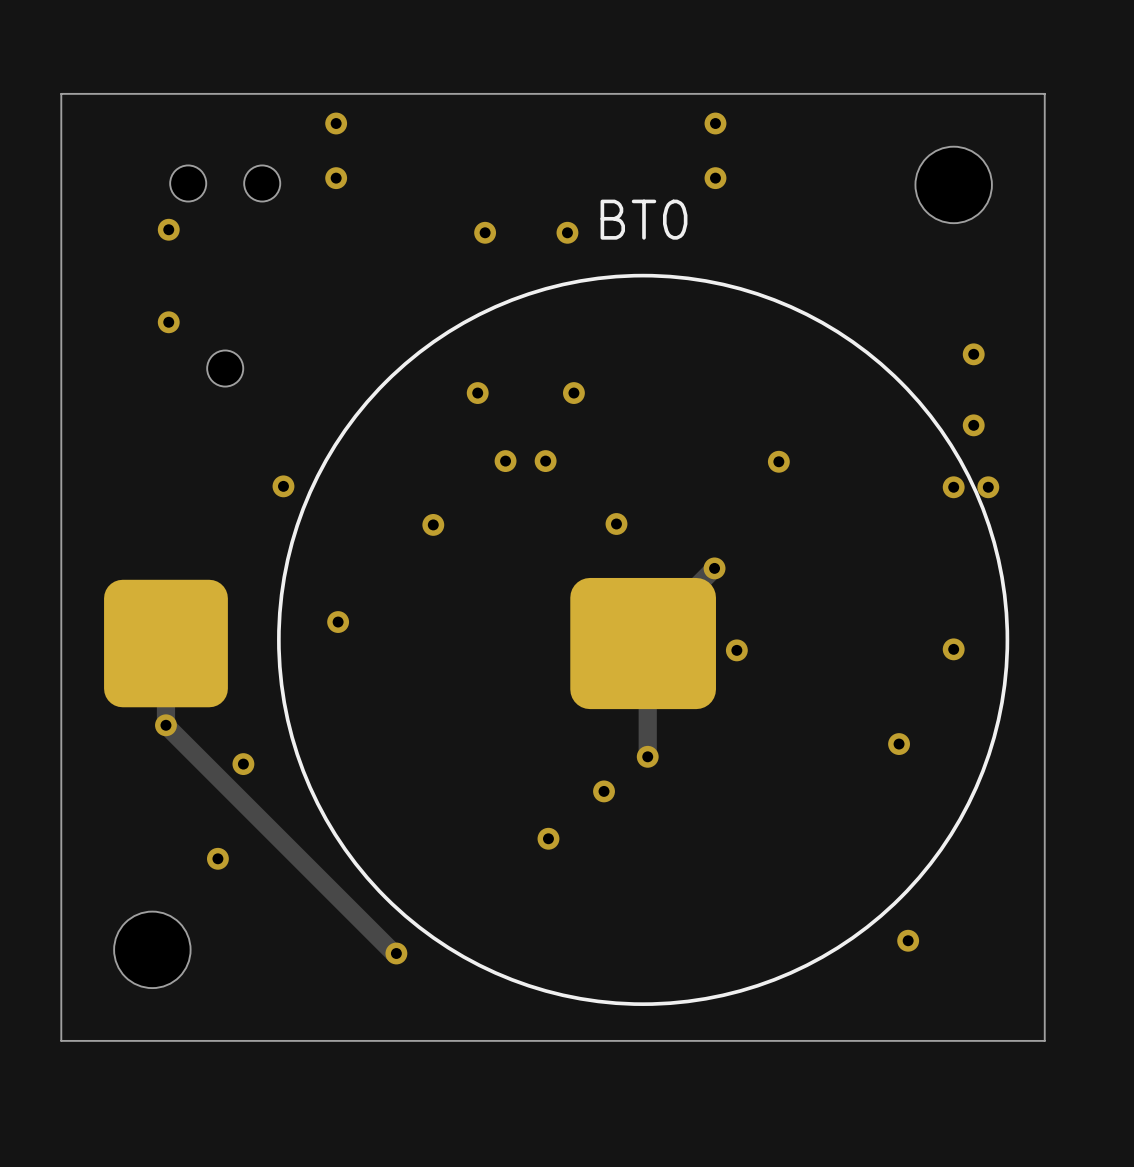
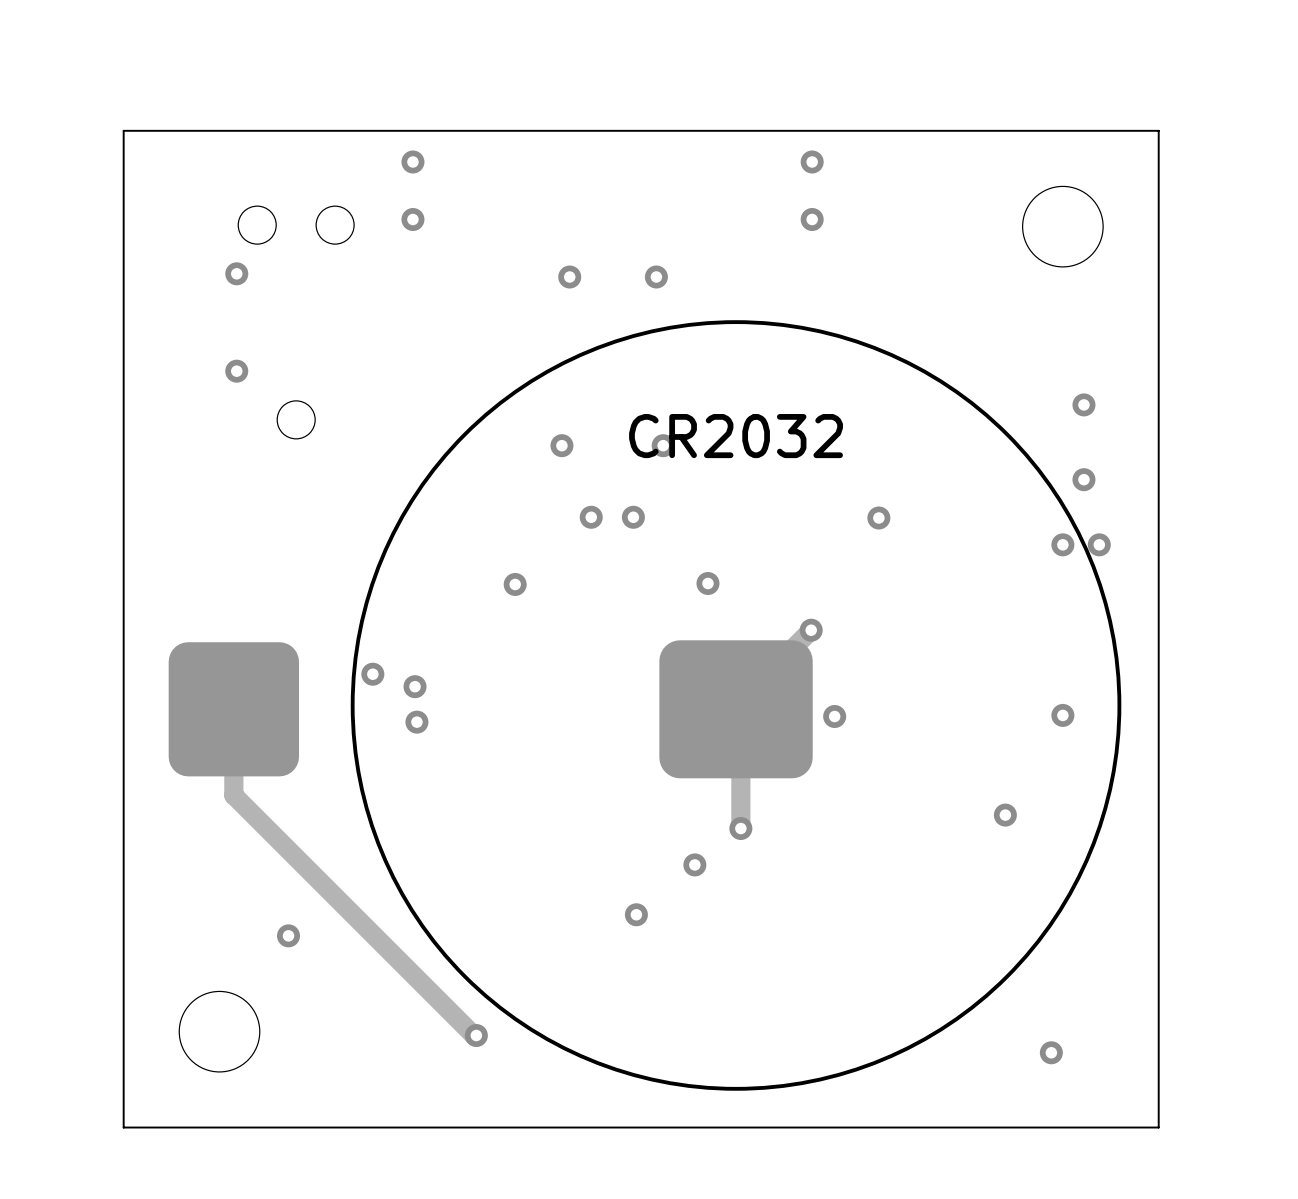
BT0 name: BT0 (644, 219) -> none
BT0 value: none -> CR2032 (736, 436)
via: (283, 486) -> none
via: none -> (372, 674)
via: none -> (416, 722)
via: (165, 725) -> none
via: (243, 764) -> none
via position: (908, 940) -> (1051, 1052)

